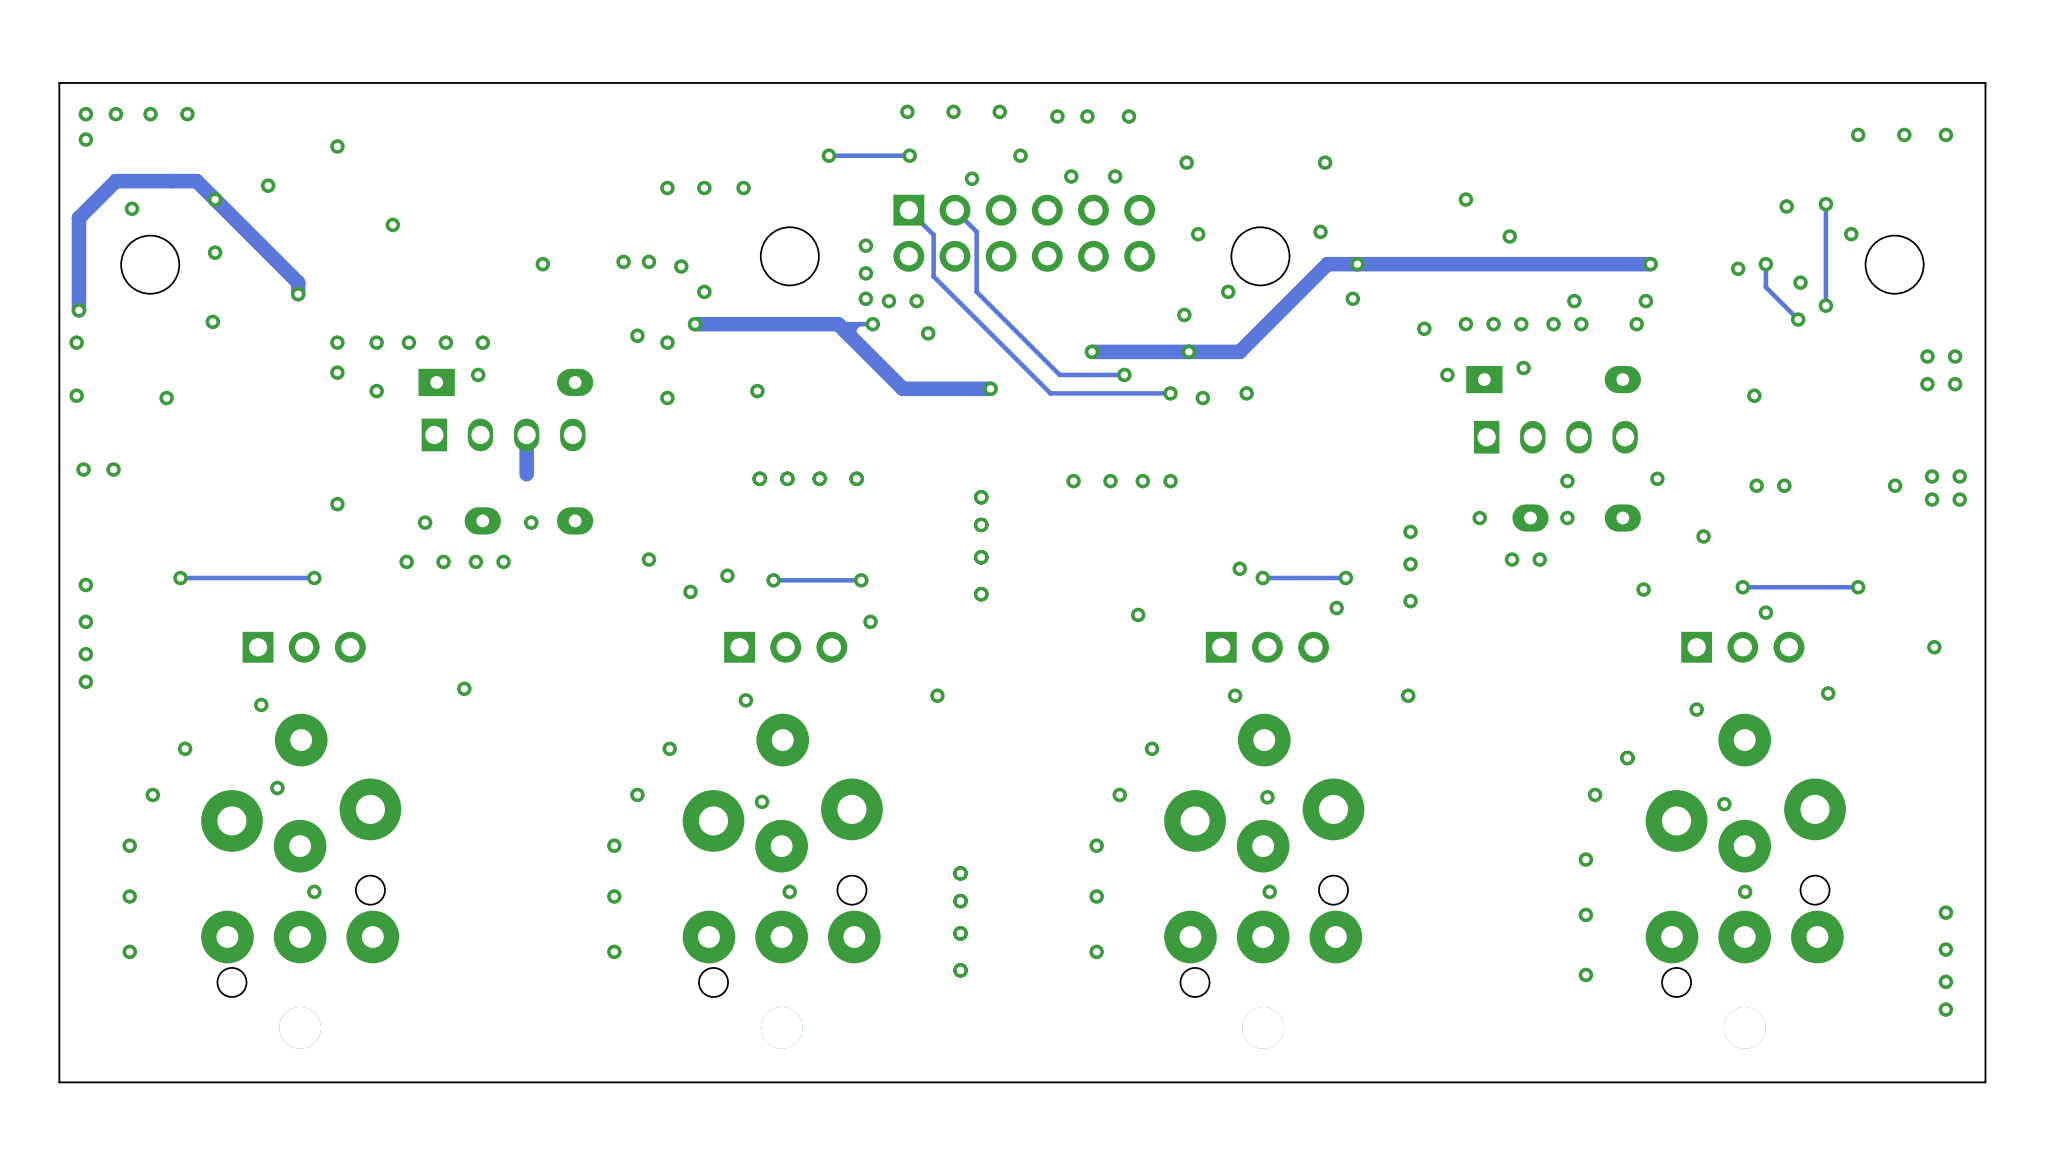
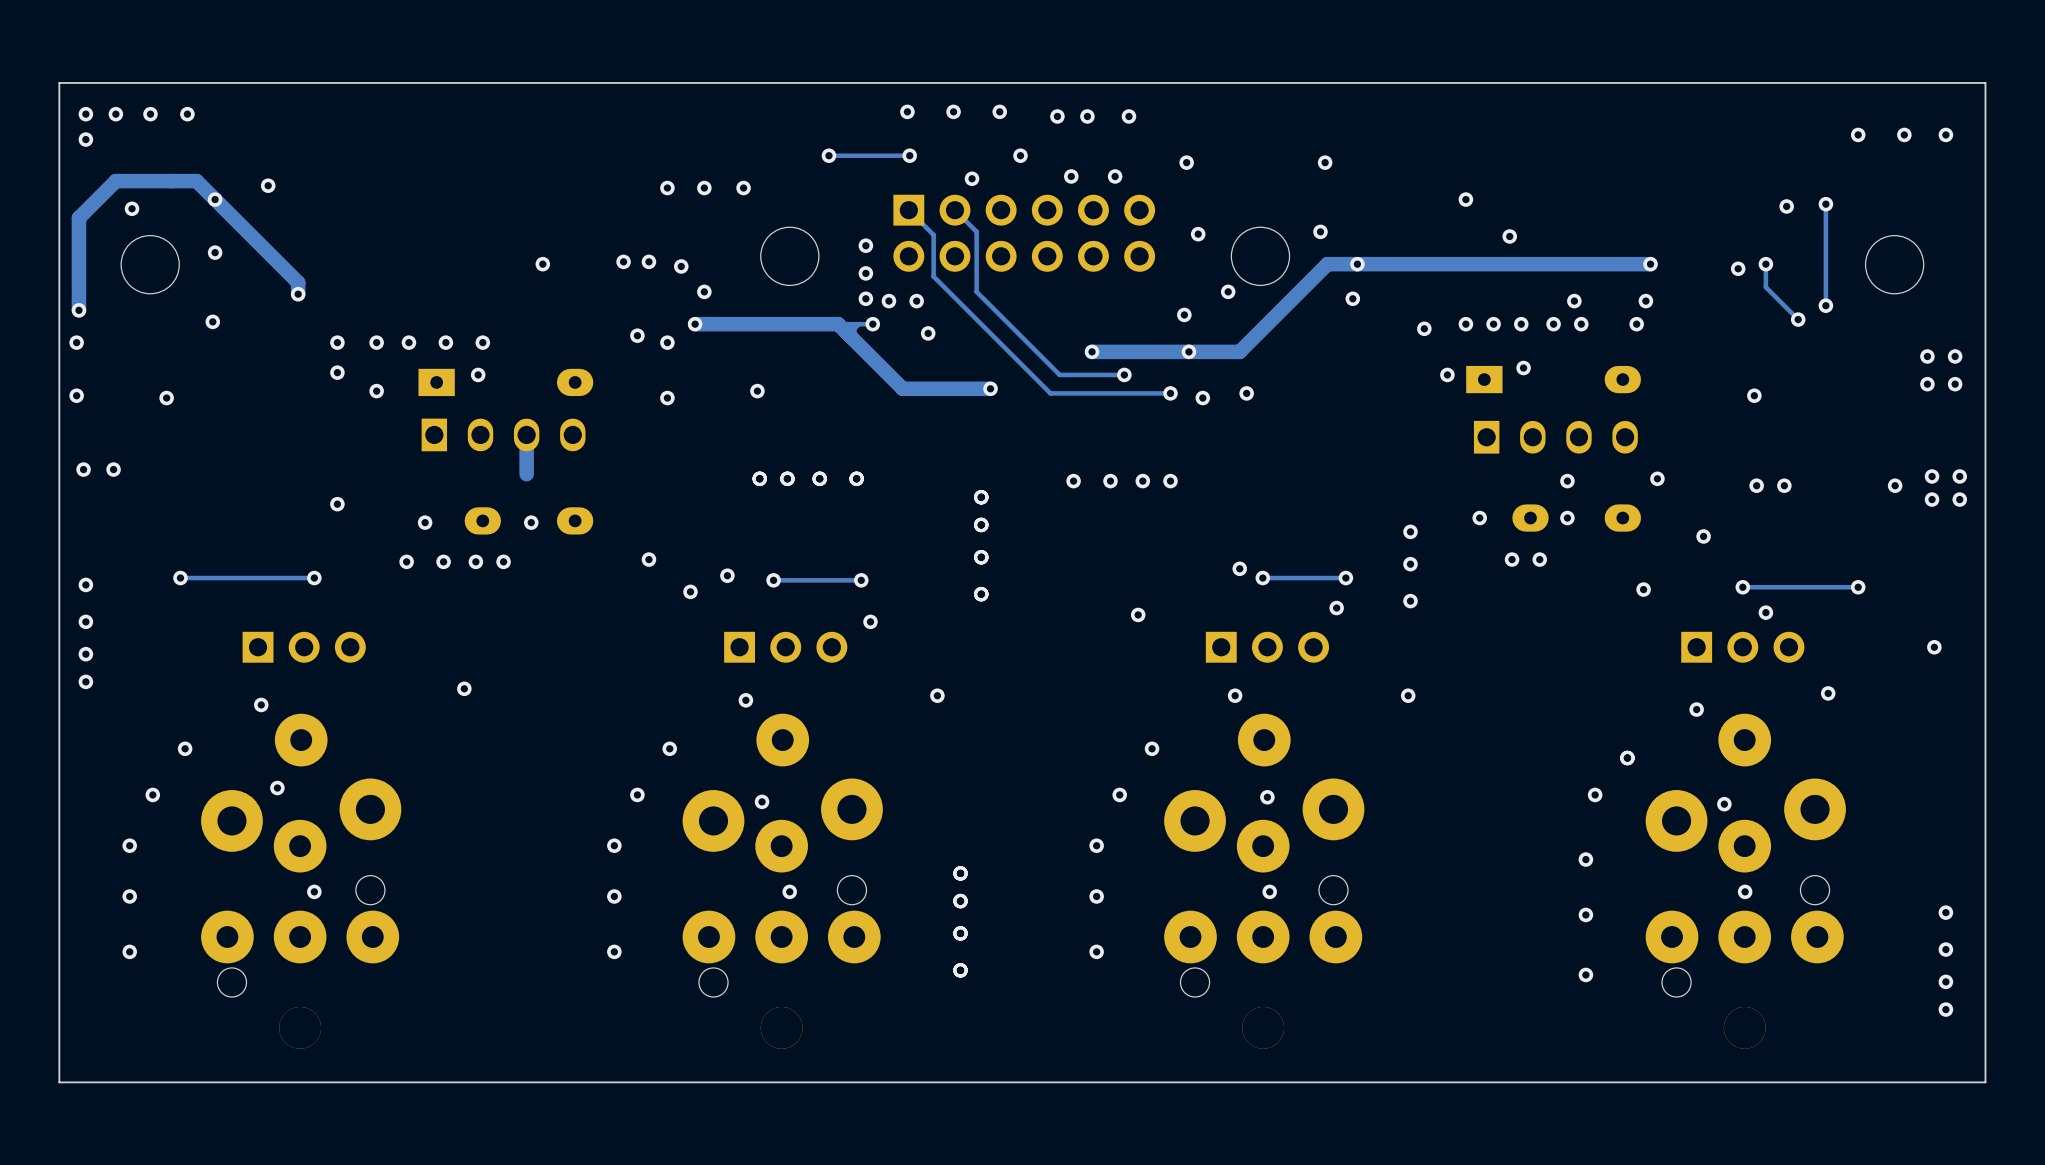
via: (337, 146) -> none
via: (392, 224) -> none
via: (1851, 234) -> none
via: (1800, 282) -> none

